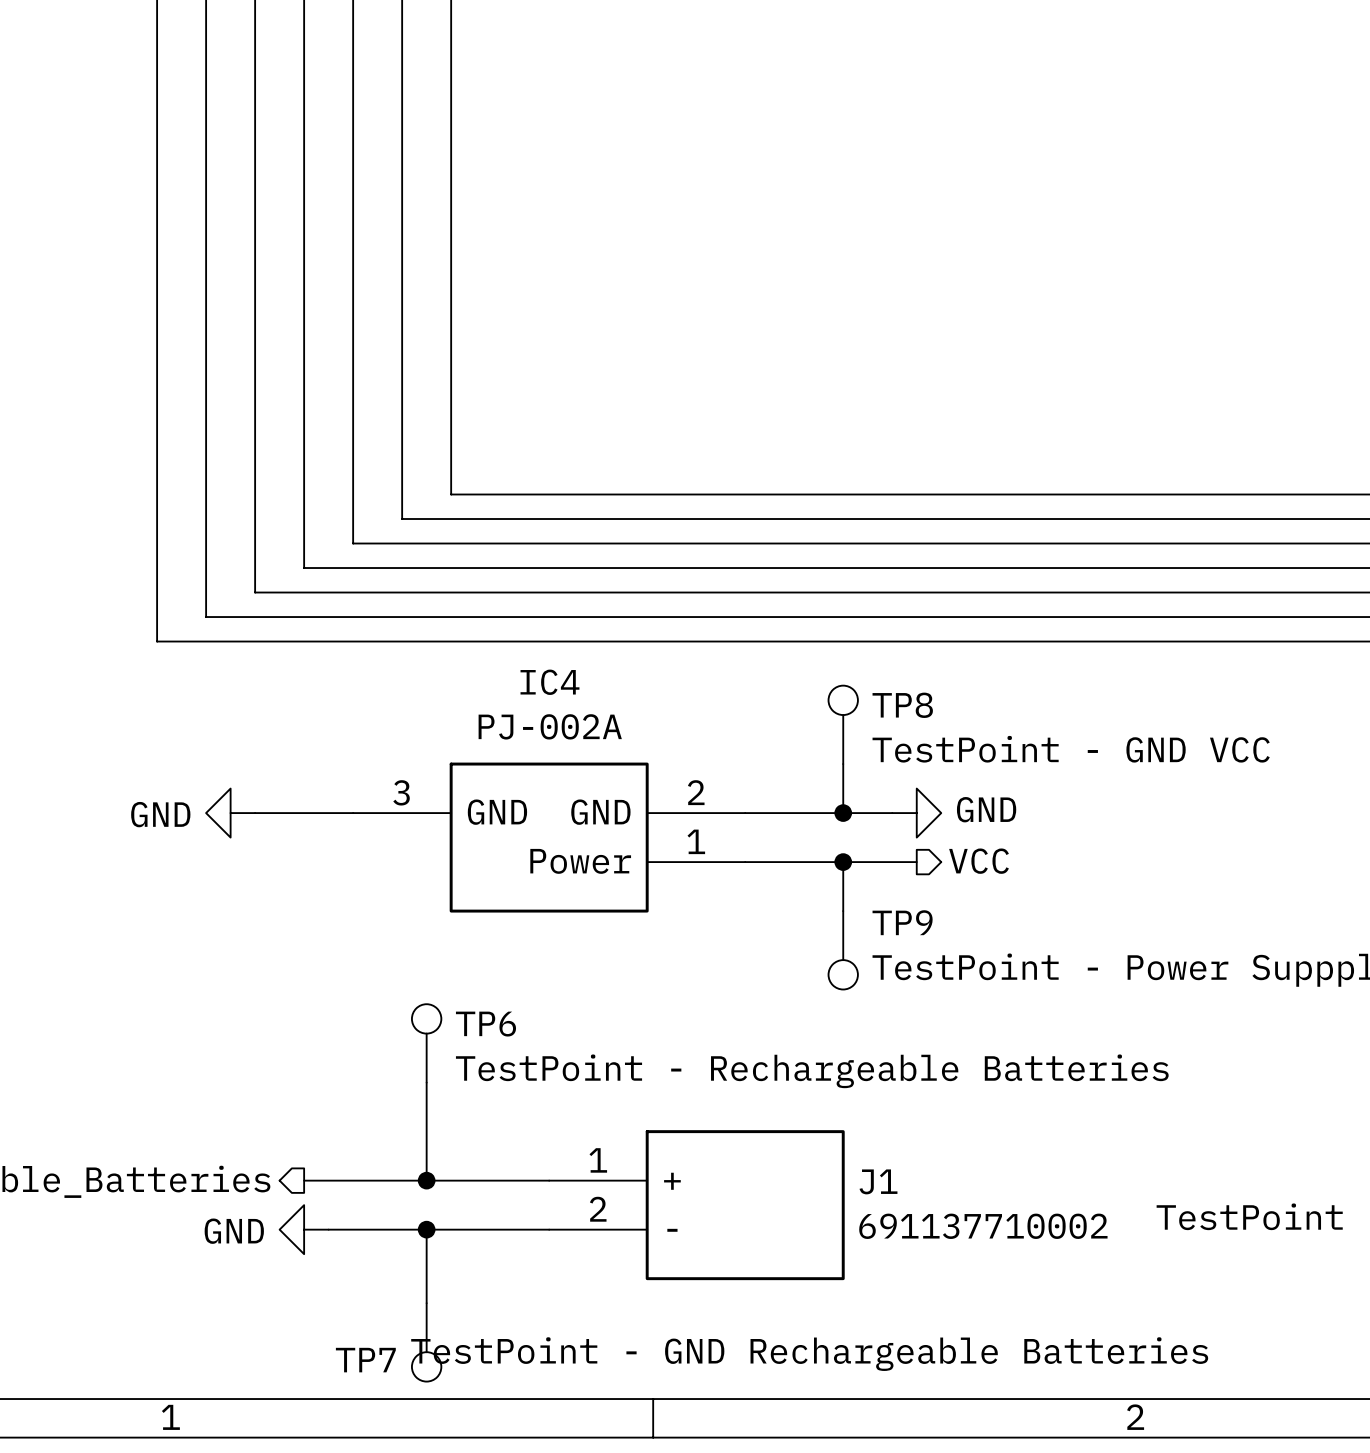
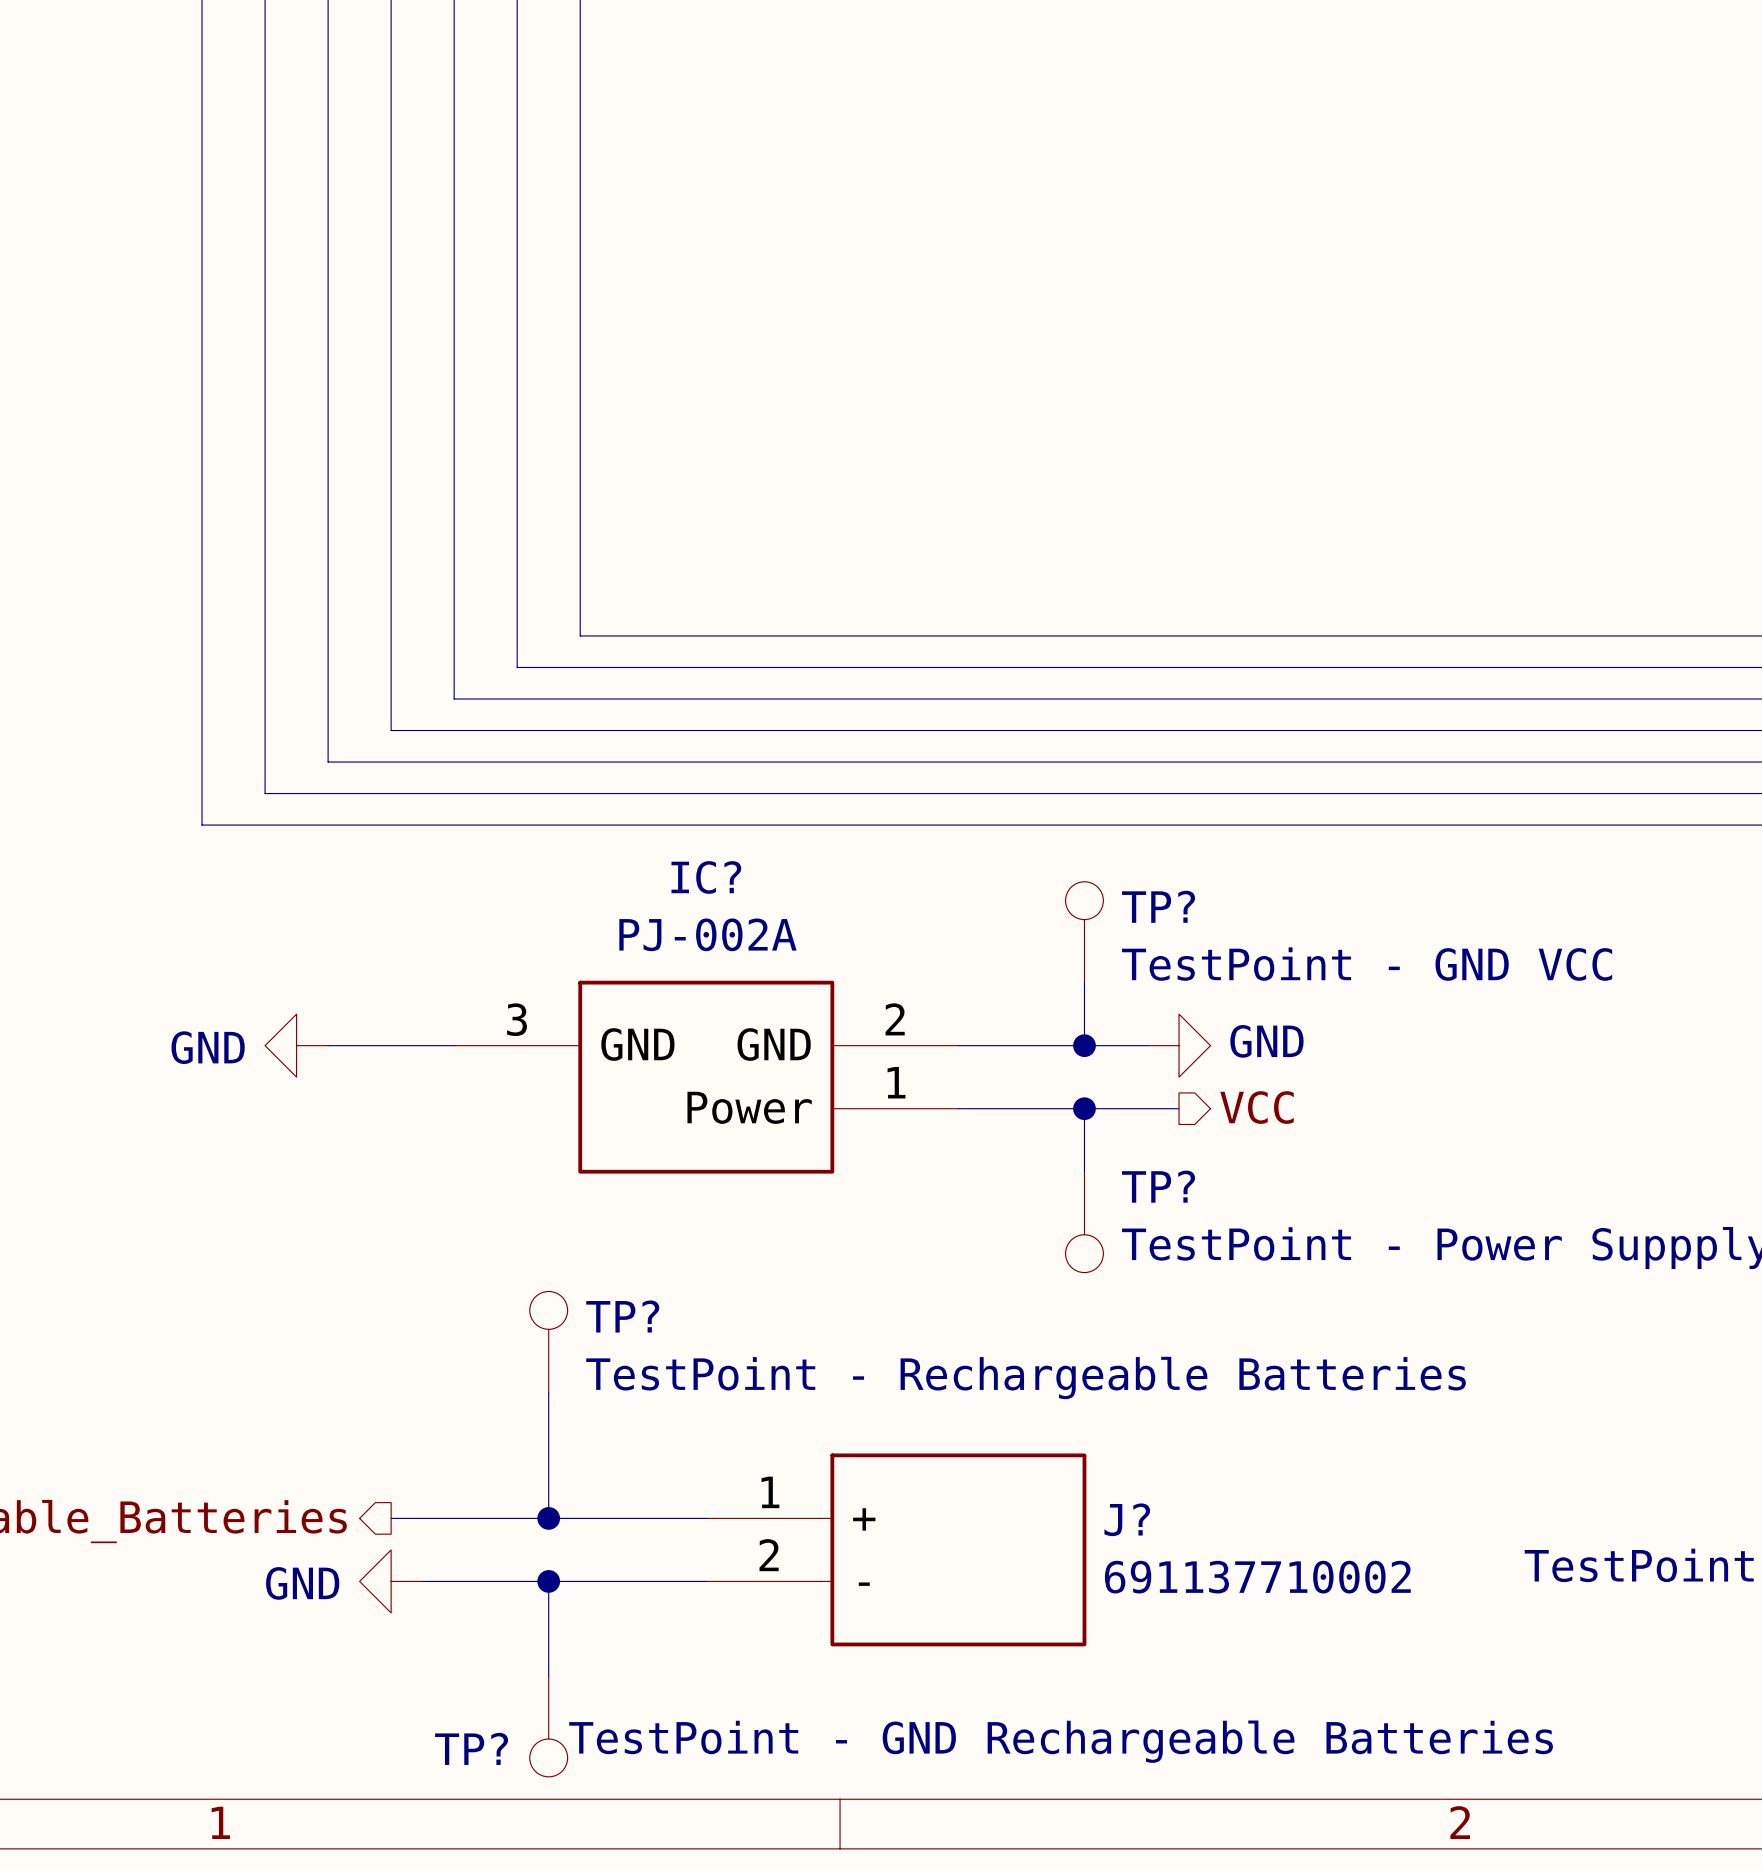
IC4 name: IC4 (549, 682) -> IC? (706, 877)
TP8 name: TP8 (902, 705) -> TP? (1158, 906)
TP9 name: TP9 (902, 922) -> TP? (1158, 1186)
TP6 name: TP6 (485, 1024) -> TP? (622, 1316)
J1 name: J1 (878, 1181) -> J? (1127, 1519)
TP7 name: TP7 (365, 1360) -> TP? (471, 1748)

